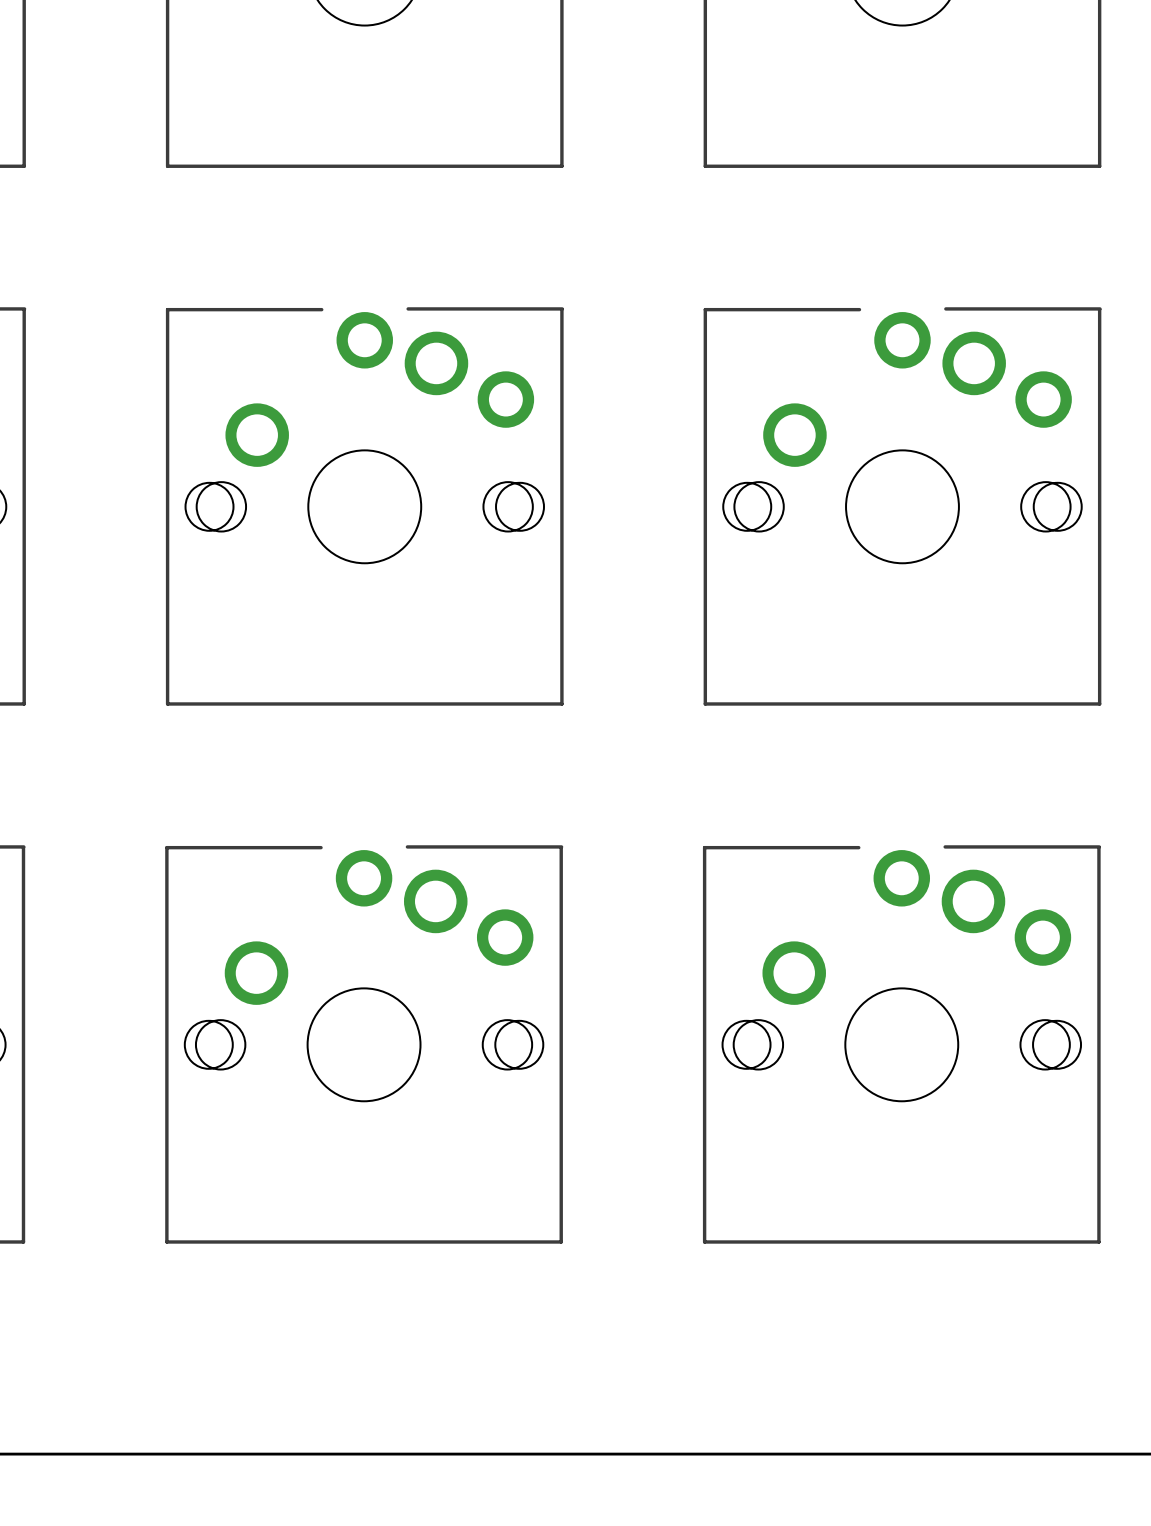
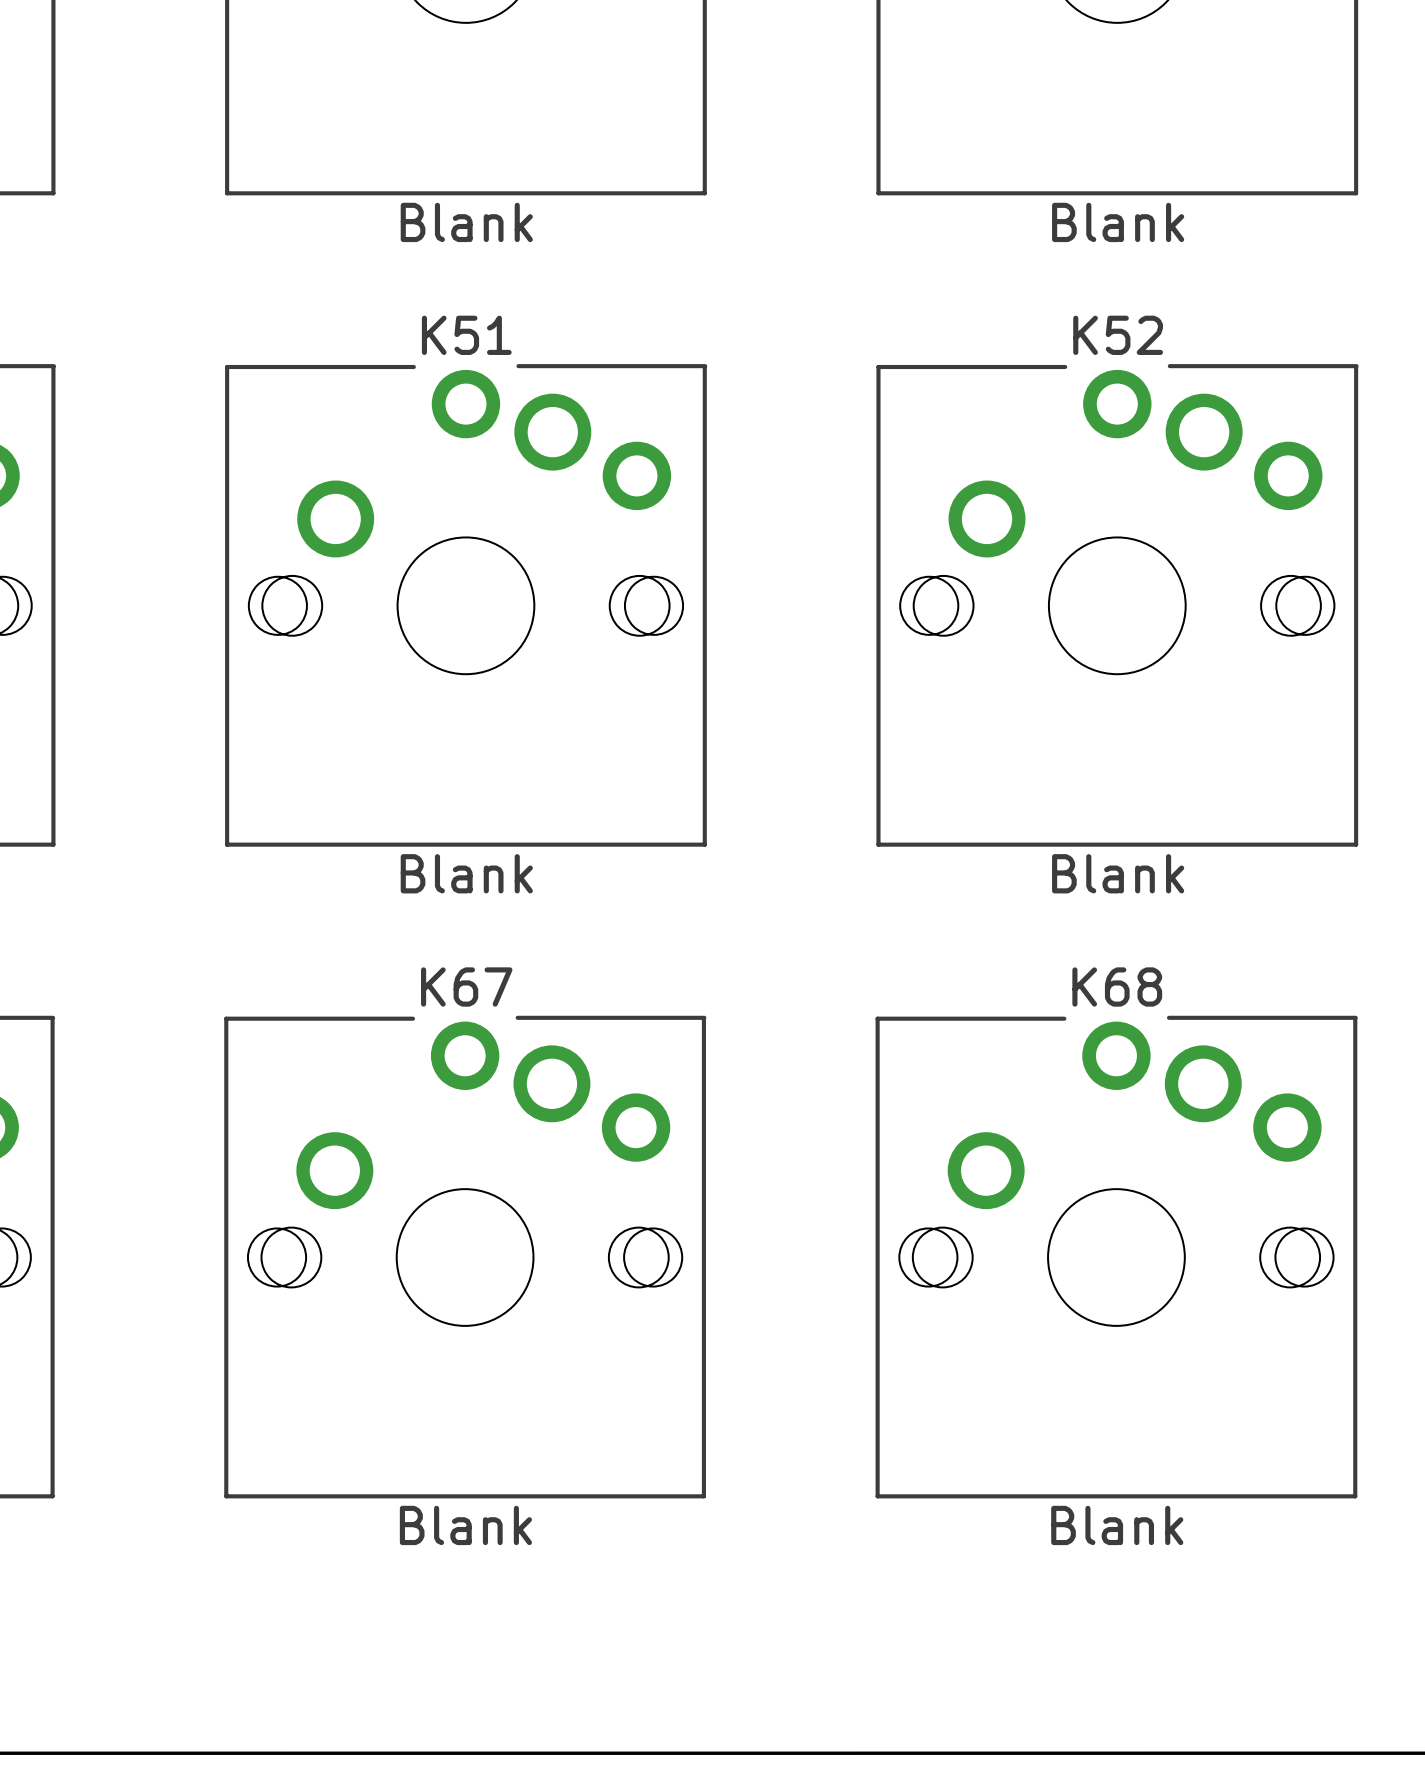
part value: none -> Blank (466, 222)
part value: none -> Blank (1118, 222)
K51 name: none -> K51 (466, 335)
K52 name: none -> K52 (1118, 335)
K51 value: none -> Blank (466, 873)
K52 value: none -> Blank (1118, 873)
K67 name: none -> K67 (466, 987)
K68 name: none -> K68 (1117, 987)
K67 value: none -> Blank (465, 1525)
K68 value: none -> Blank (1117, 1525)

